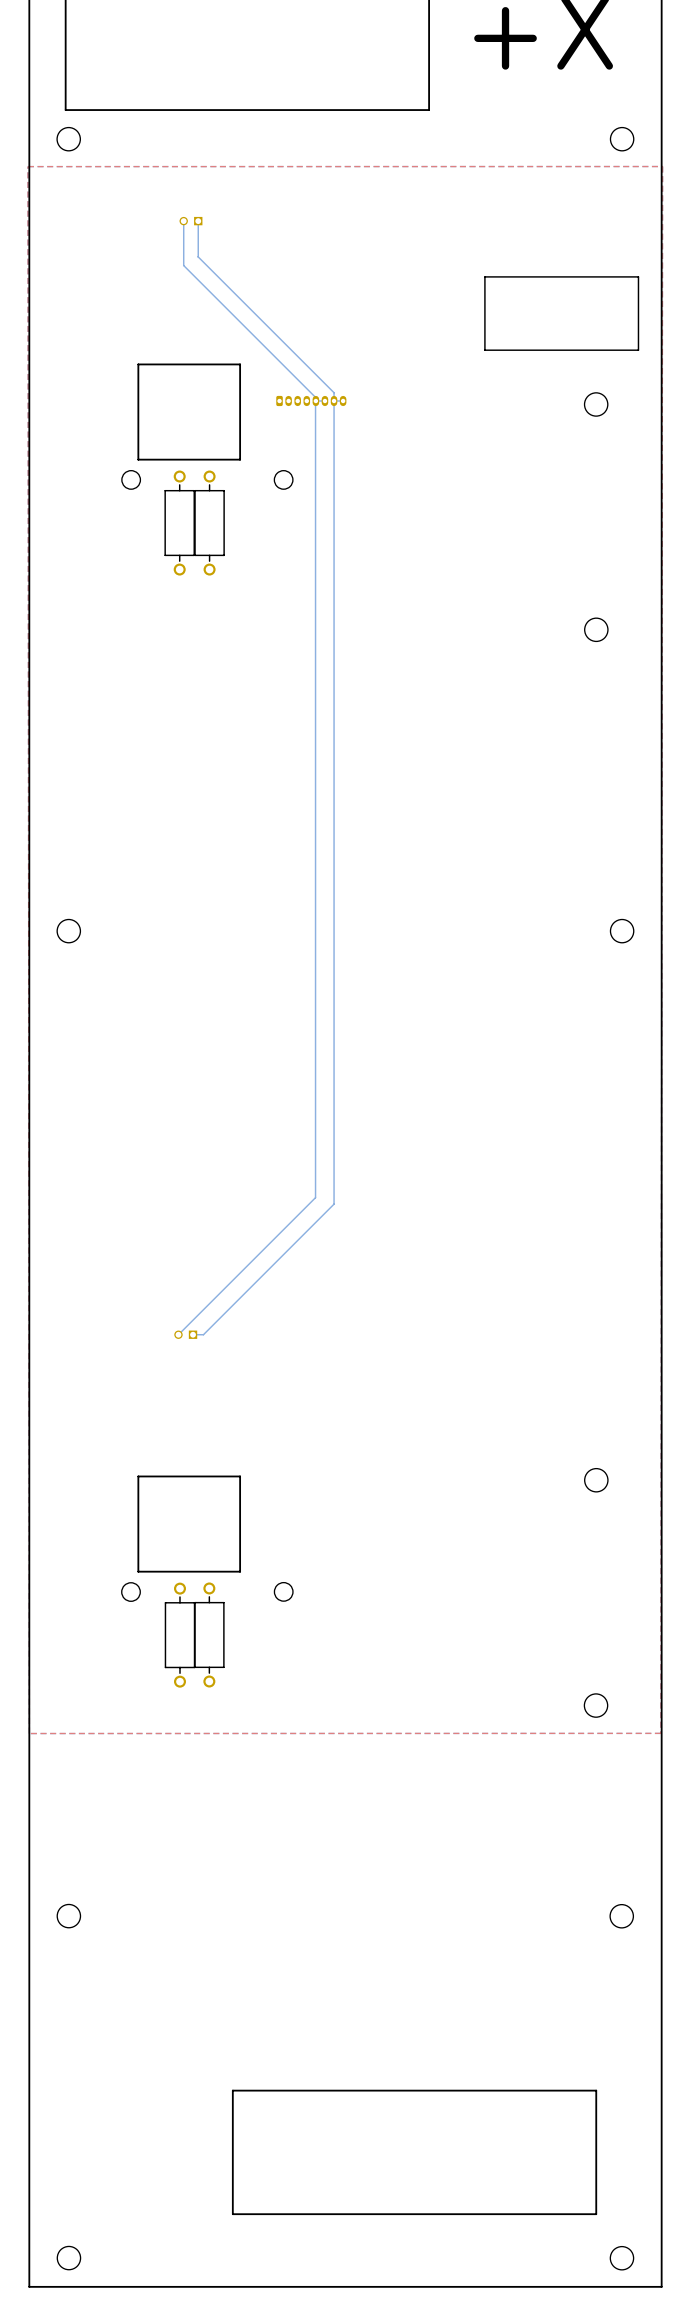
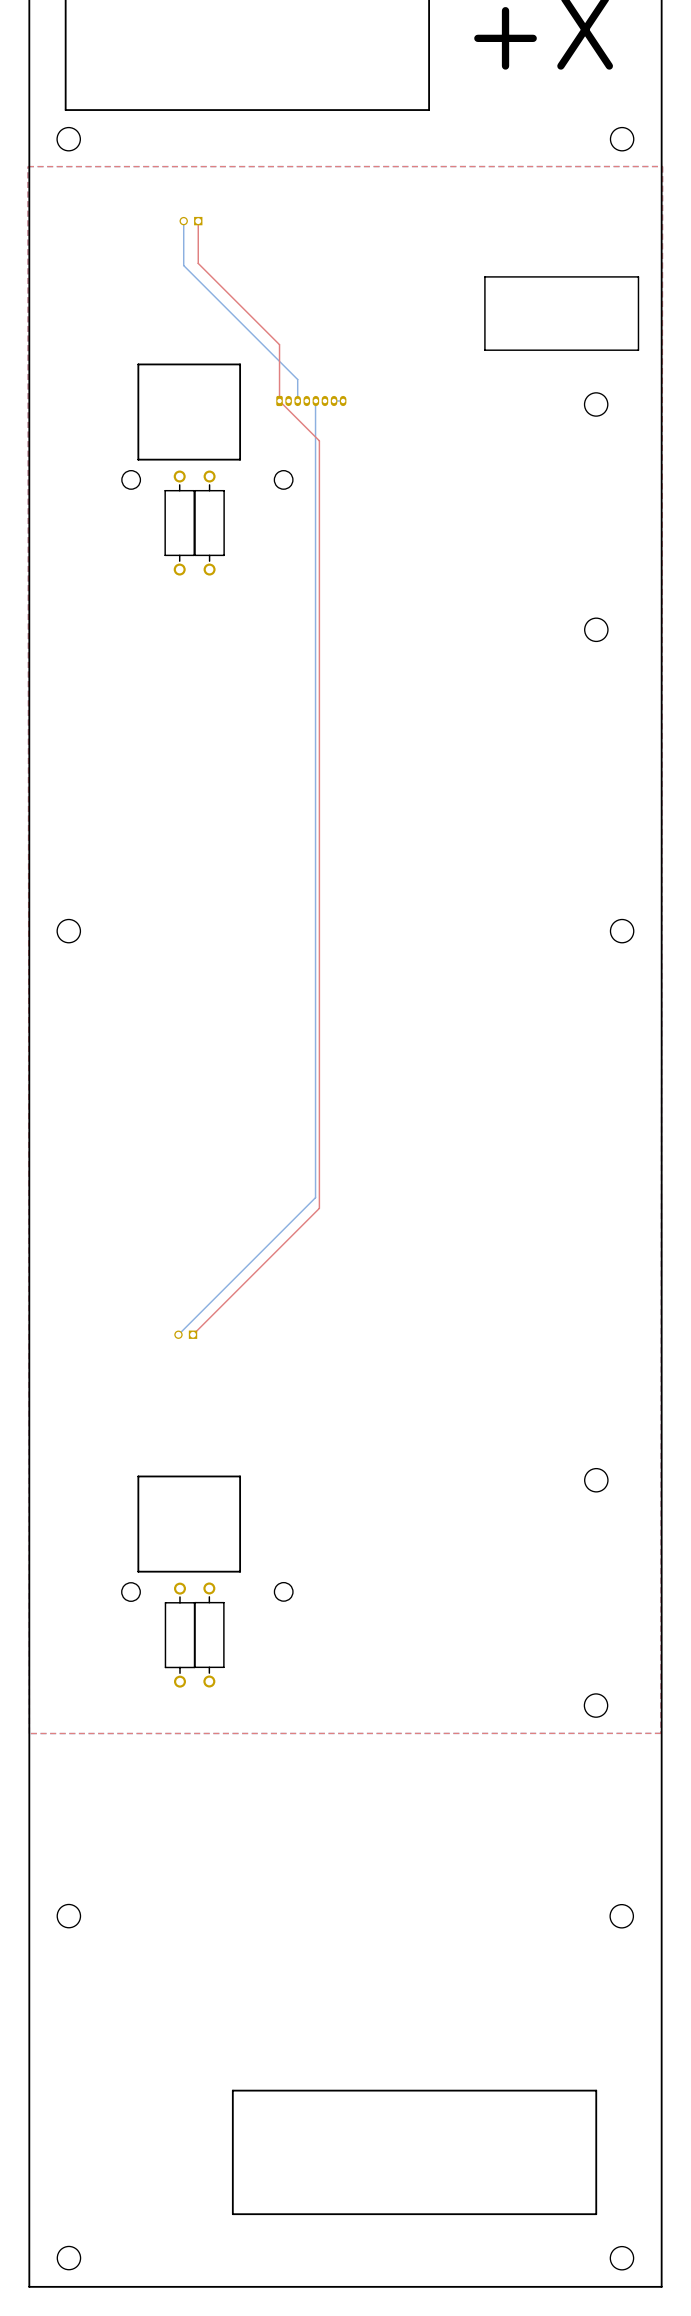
bottom track: (198, 221) (198, 256) (334, 392) (334, 1204) (203, 1334) (193, 1334) -> none
top track: none -> (198, 221) (198, 263) (279, 344) (279, 400) (319, 440) (319, 1208) (193, 1334)
bottom track: (297, 379) (315, 397) (315, 400) (324, 400) -> (297, 379) (297, 400)

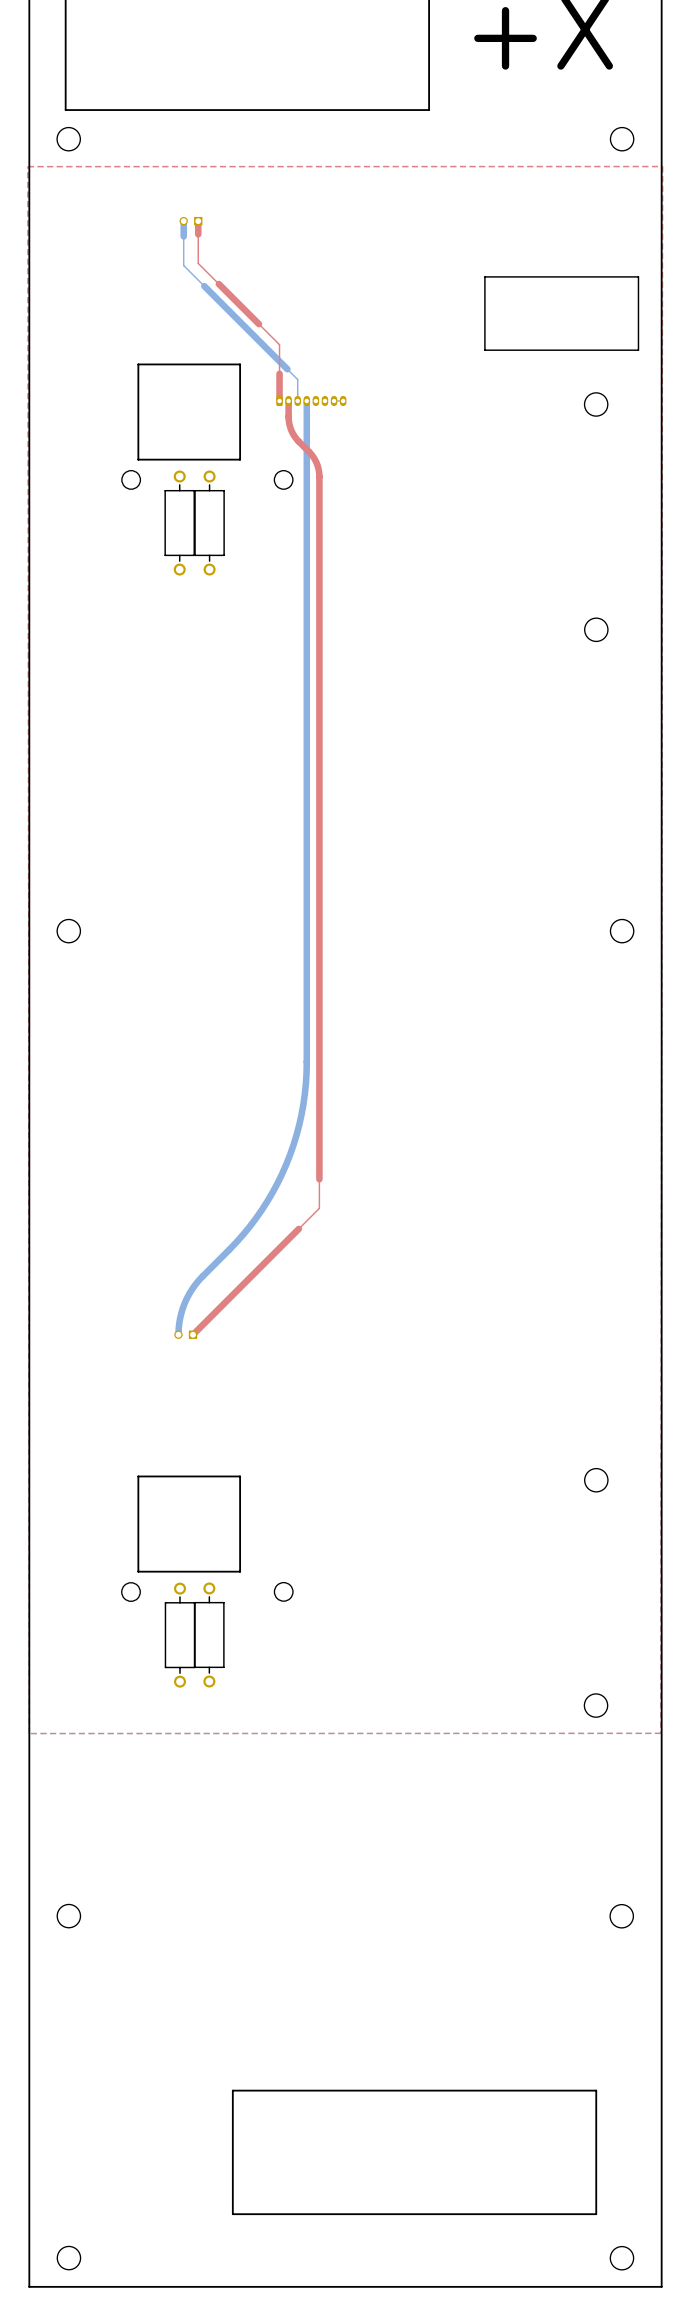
bottom track width: thin (183, 221) (183, 236) -> thick (183, 221) (183, 236)
top track width: thin (198, 221) (198, 234) -> thick (198, 221) (198, 234)
top track width: thin (218, 283) (258, 324) -> thick (218, 283) (258, 324)
bottom track width: thin (204, 286) (287, 369) -> thick (204, 286) (287, 369)
top track width: thin (279, 373) (279, 400) -> thick (279, 373) (279, 400)
top track: (279, 400) (319, 440) (319, 476) -> (288, 416) (290, 427) (294, 436) (315, 460) (319, 476)
top track: none -> (288, 400) (288, 416)
bottom track: (315, 404) (315, 1197) (178, 1334) -> (306, 400) (306, 1062) (304, 1093) (296, 1134) (277, 1182) (249, 1226) (192, 1288) (181, 1313) (178, 1334)
top track width: thin (319, 476) (319, 1179) -> thick (319, 476) (319, 1179)
top track width: thin (298, 1228) (193, 1334) -> thick (298, 1228) (193, 1334)

